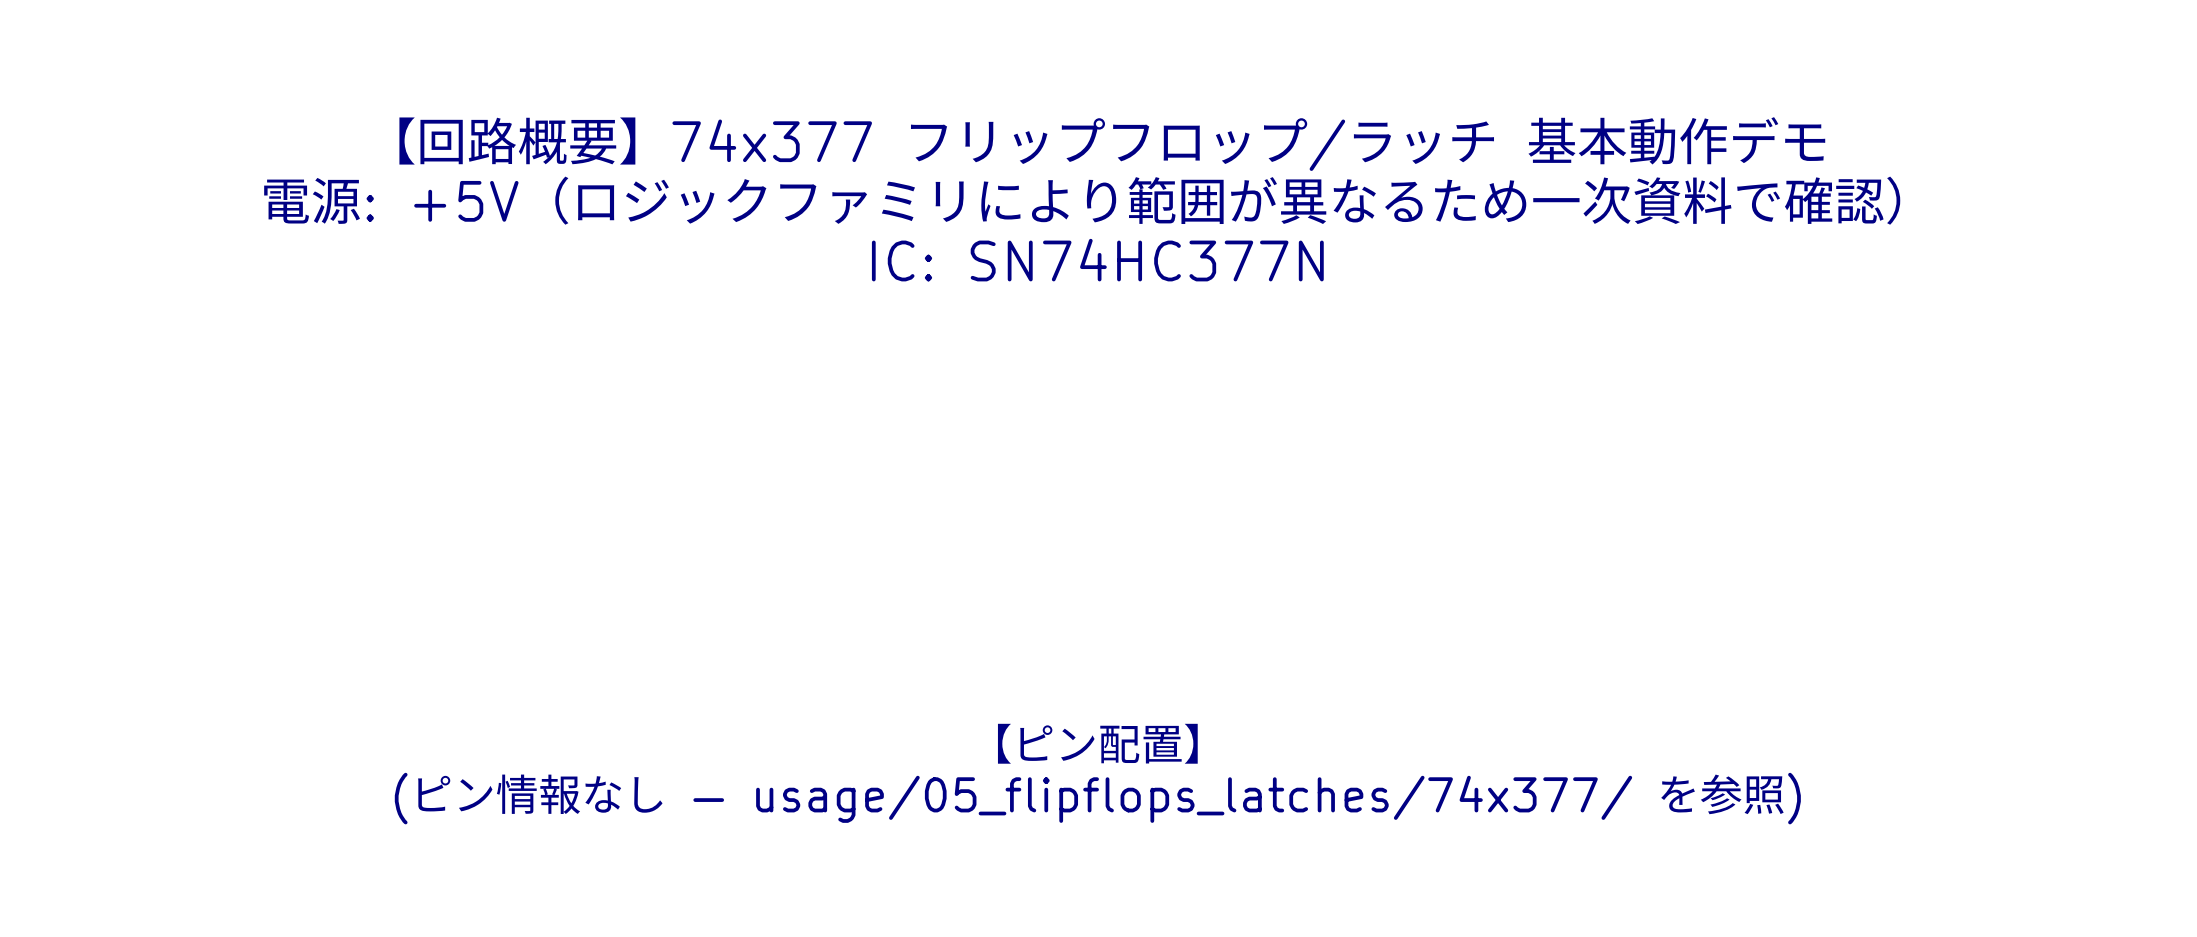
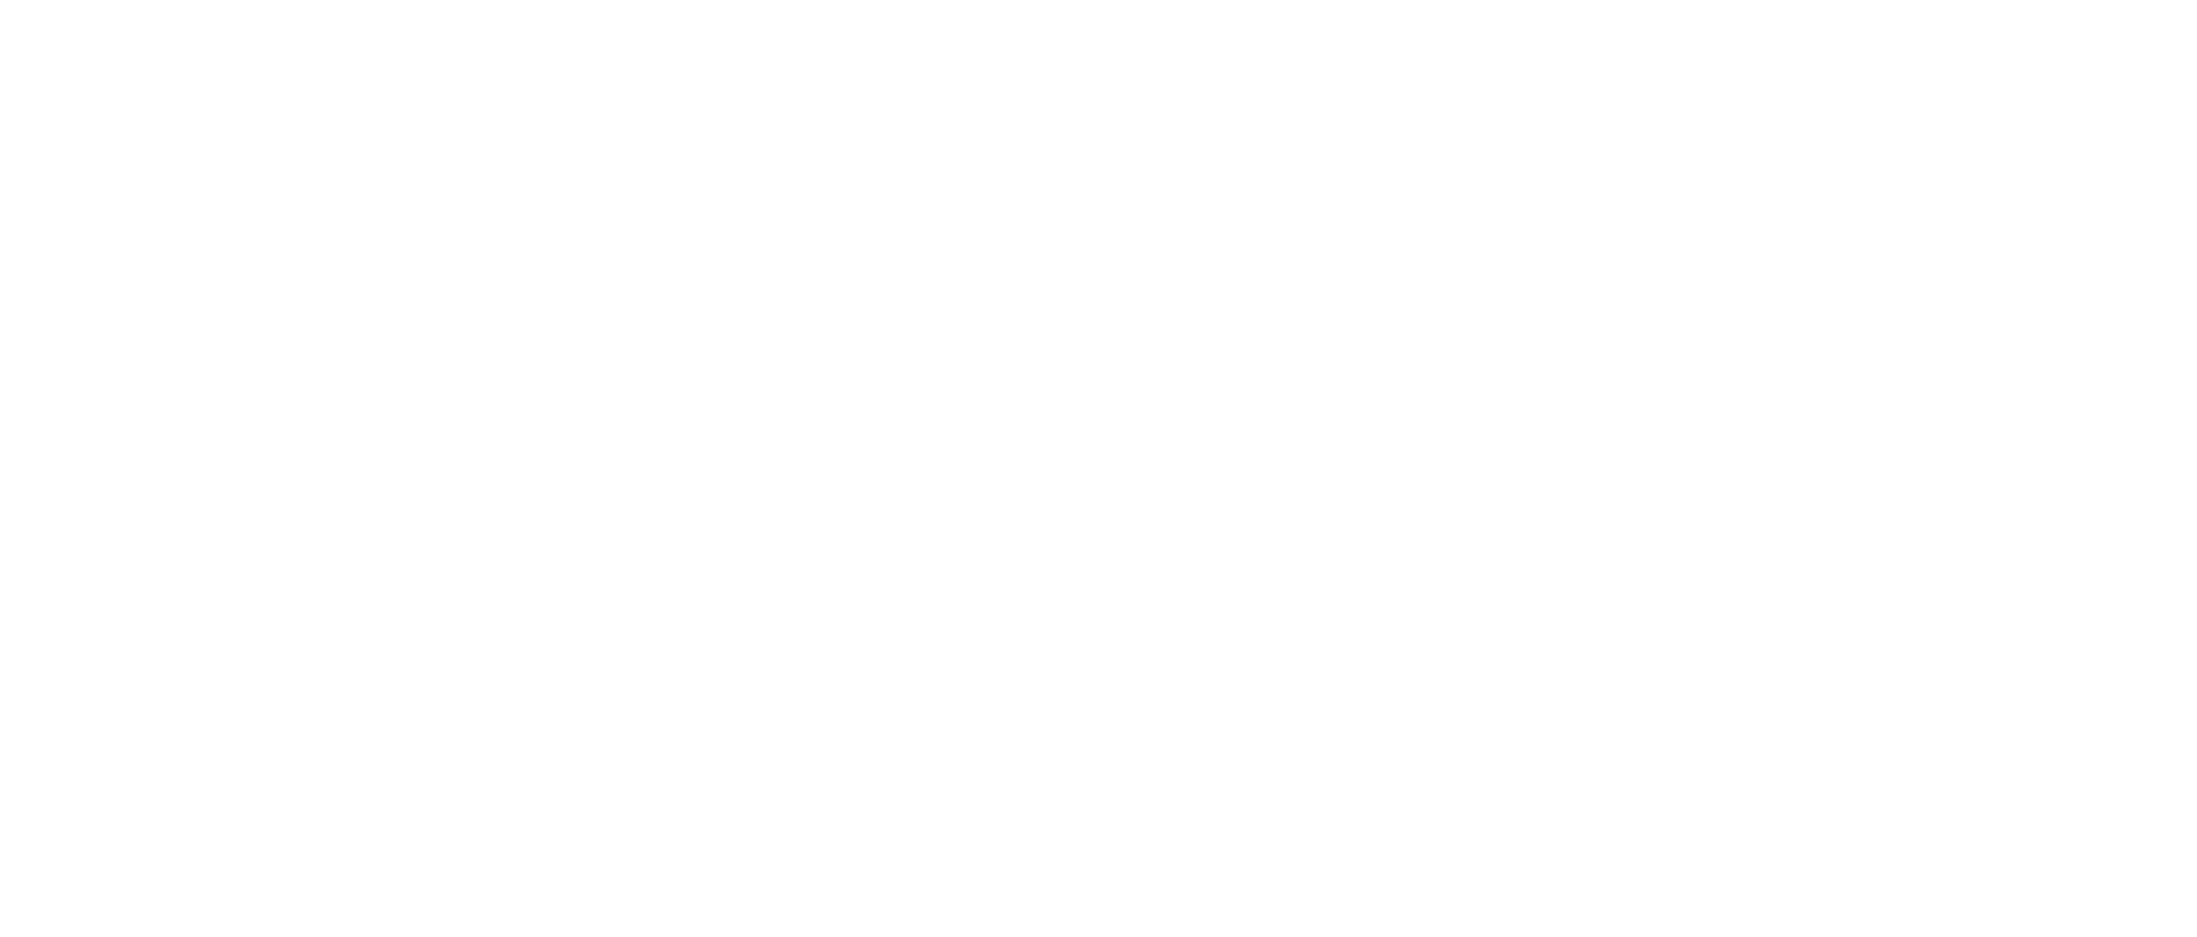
text: 【回路概要】74x377 フリップフロップ/ラッチ 基本動作デモ (1112, 143) -> none
text: 電源: +5V（ロジックファミリにより範囲が異なるため一次資料で確認） (1082, 200) -> none
text: IC: SN74HC377N (1097, 260) -> none
text: 【ピン配置】 (1097, 743) -> none
text: (ピン情報なし — usage/05_flipflops_latches/74x377/ を参照) (1097, 798) -> none

